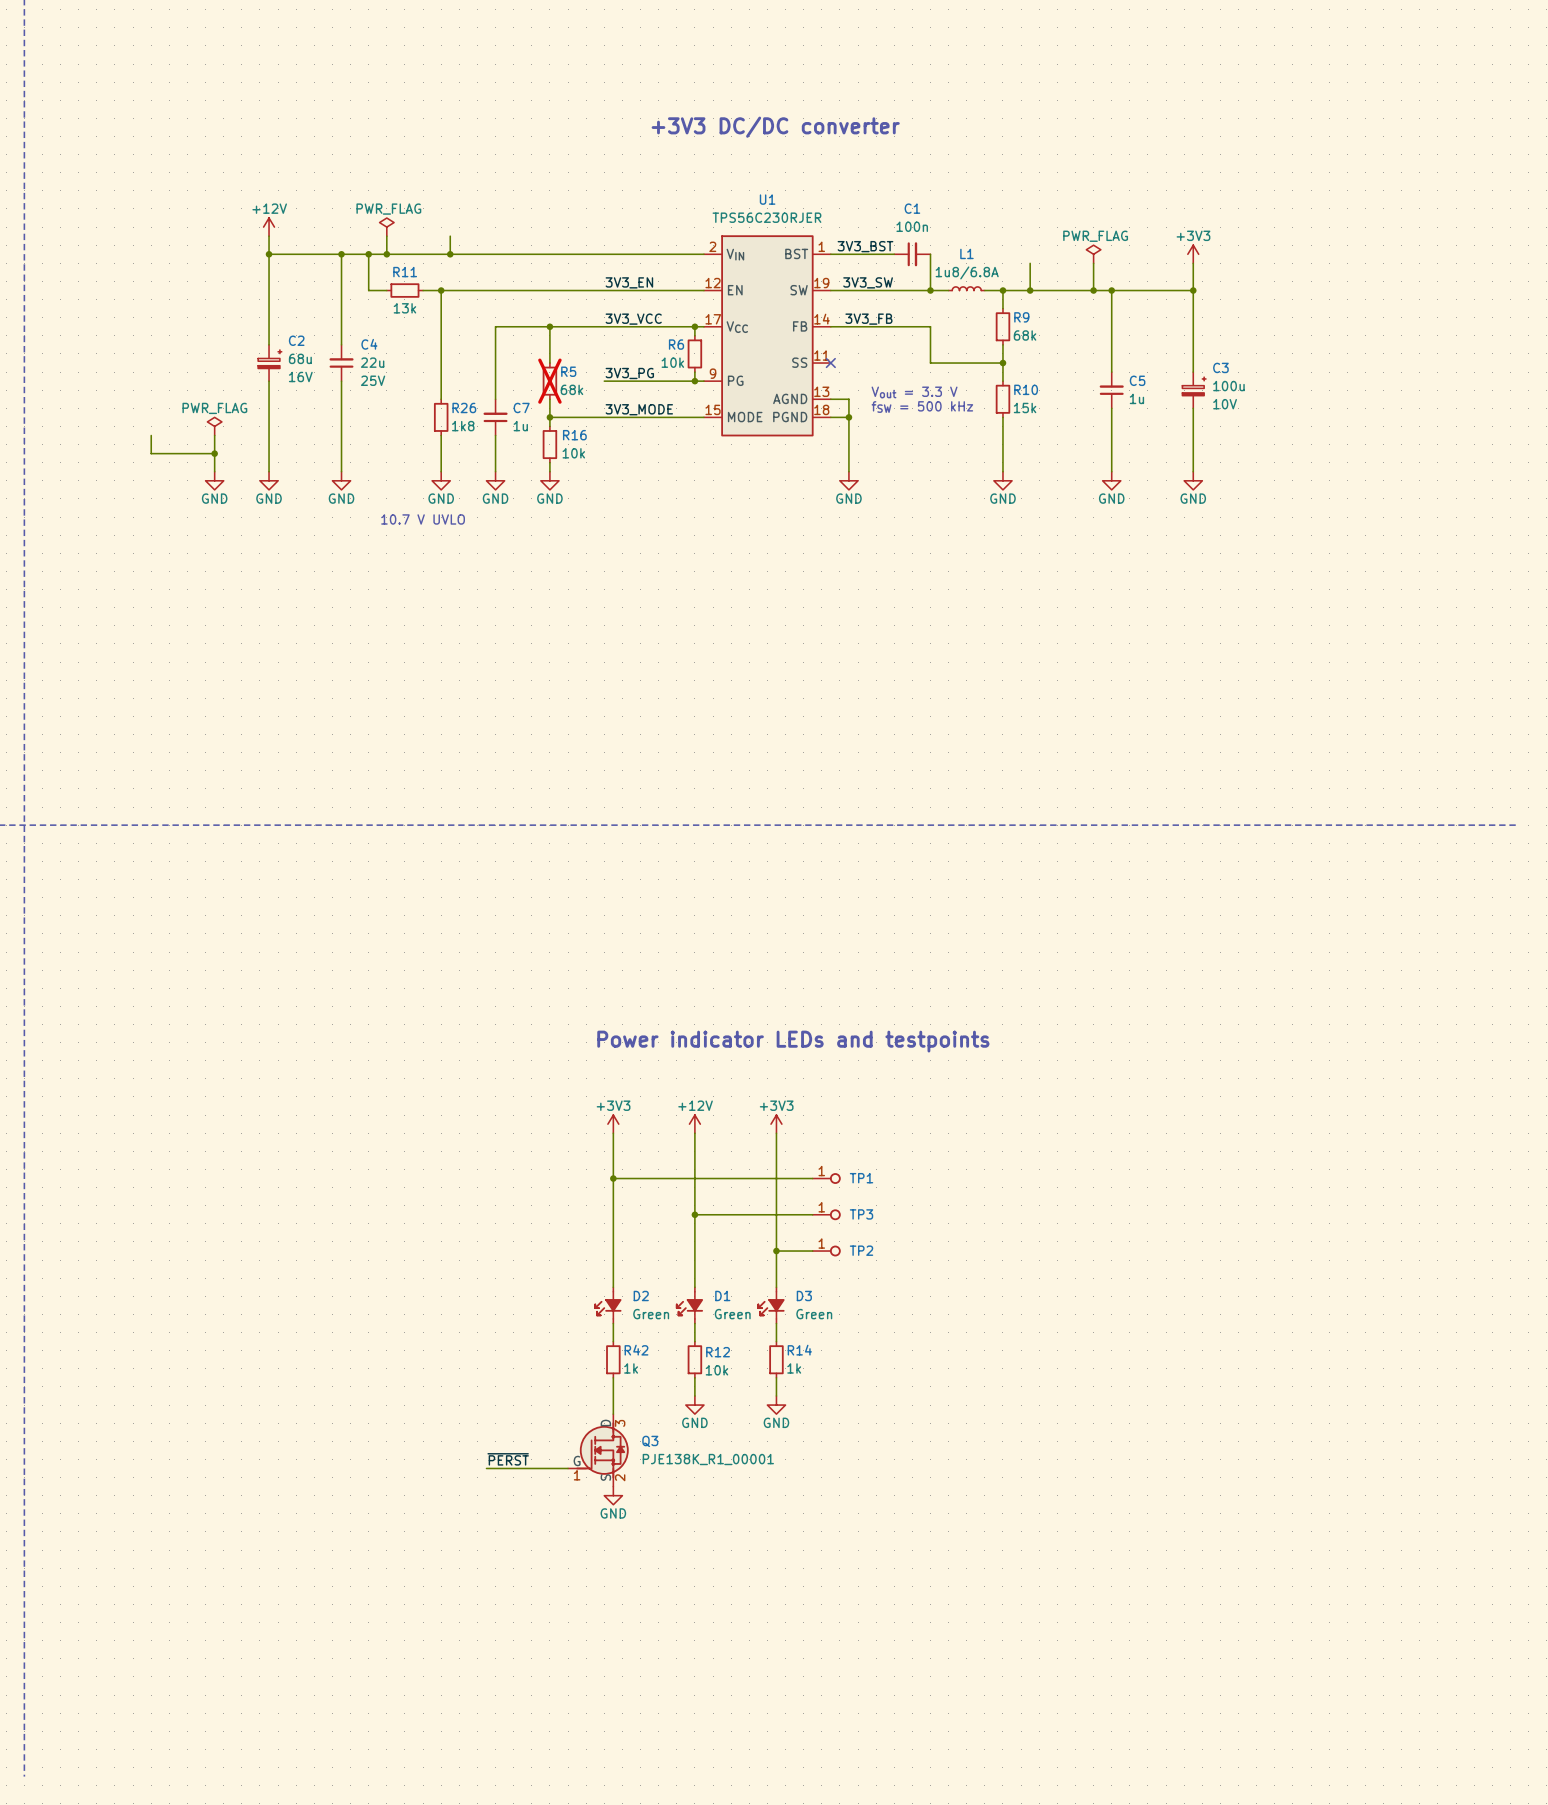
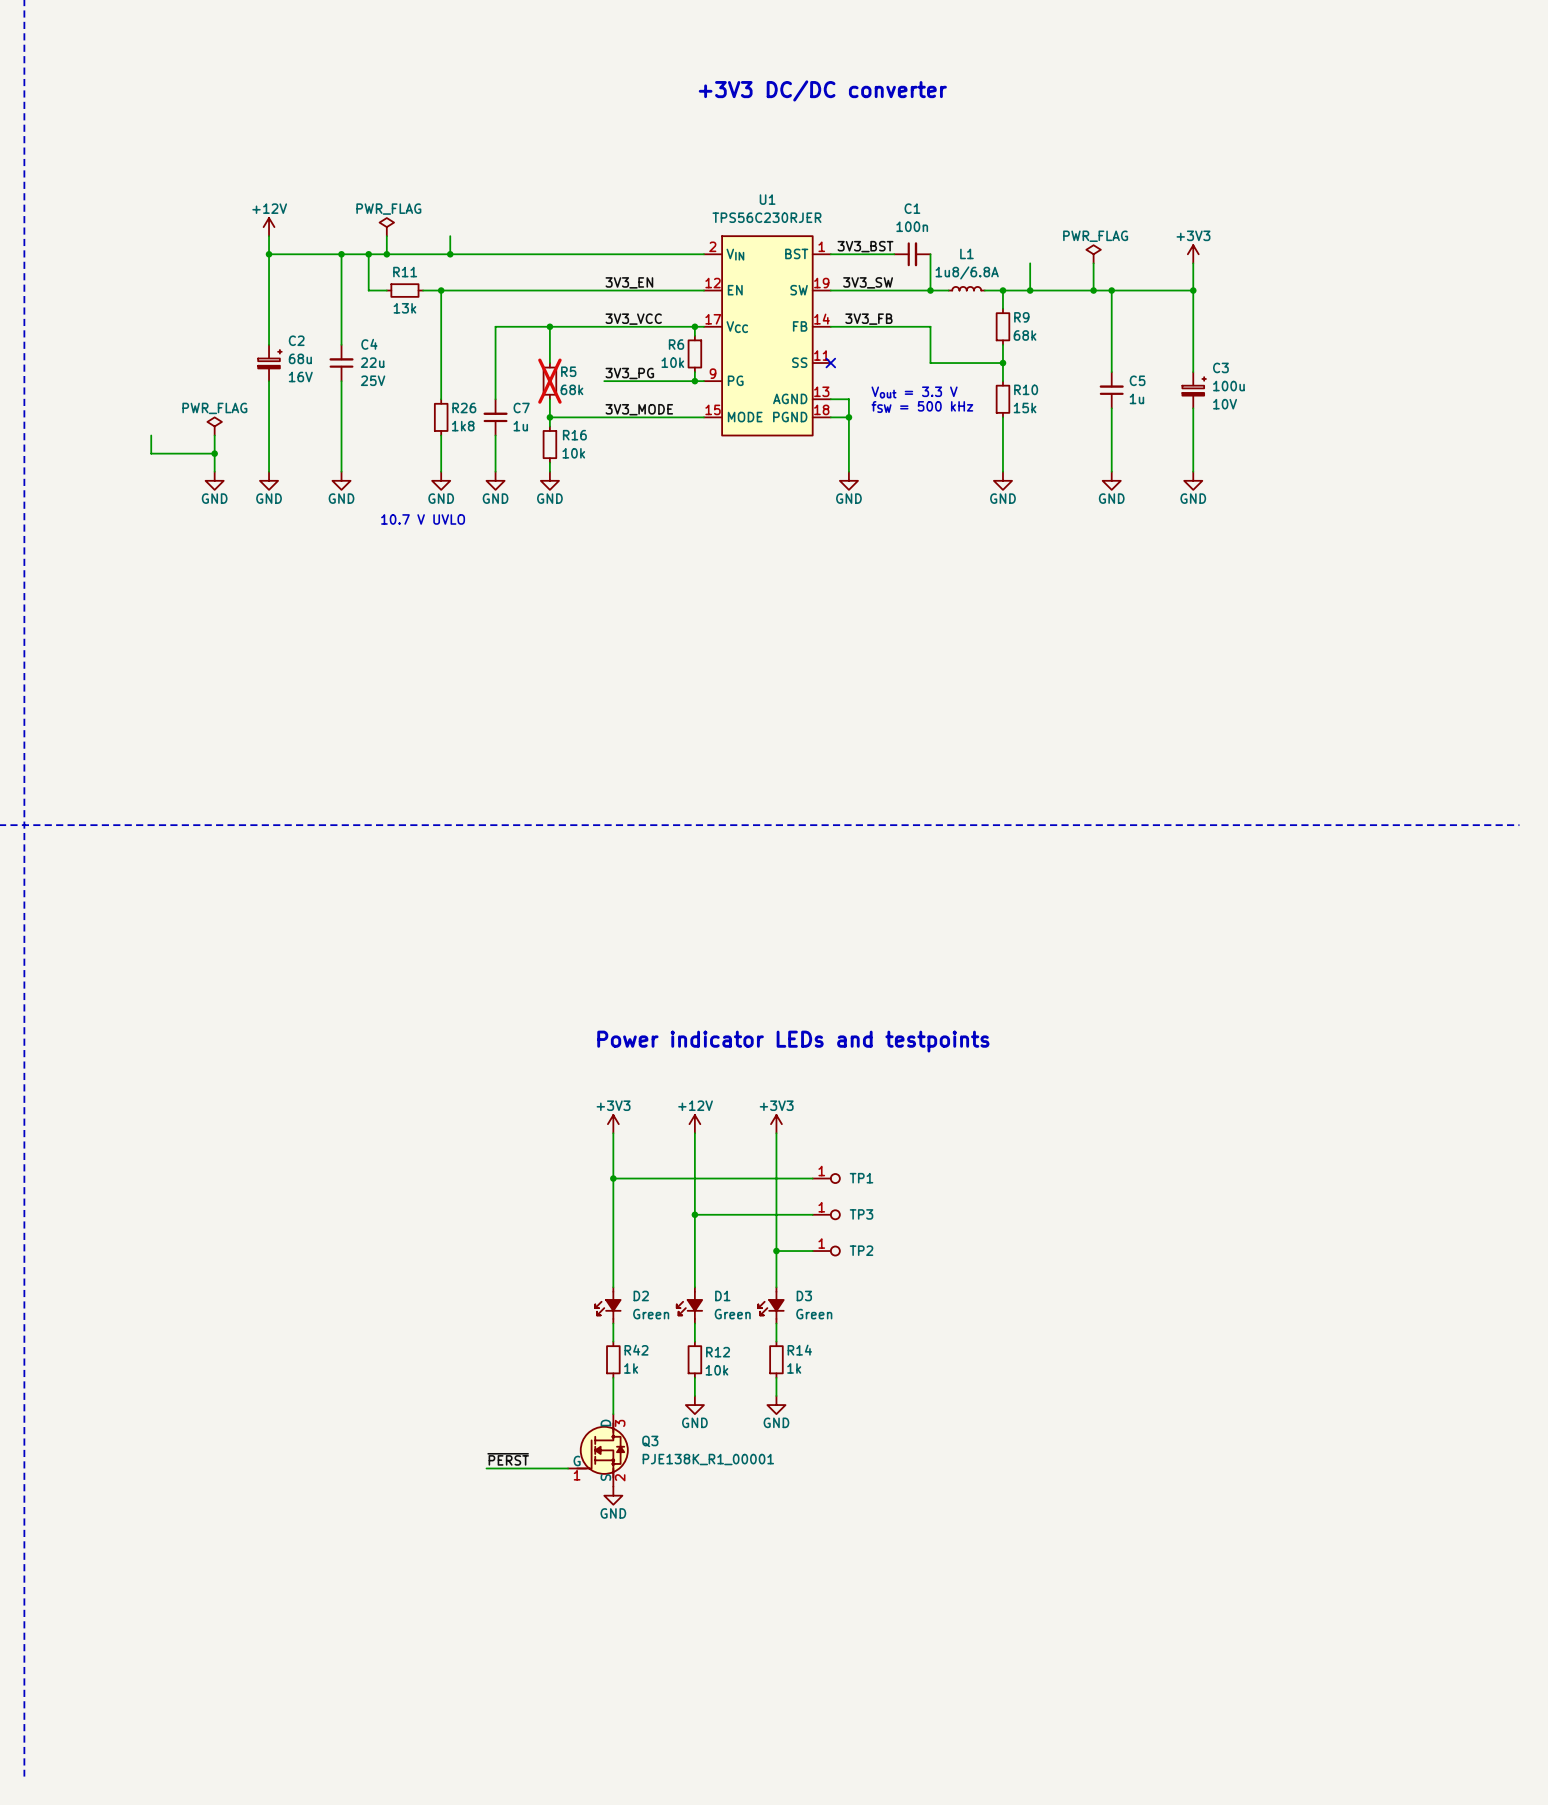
text position: +3V3 DC/DC converter (775, 127) -> +3V3 DC/DC converter (822, 90)

